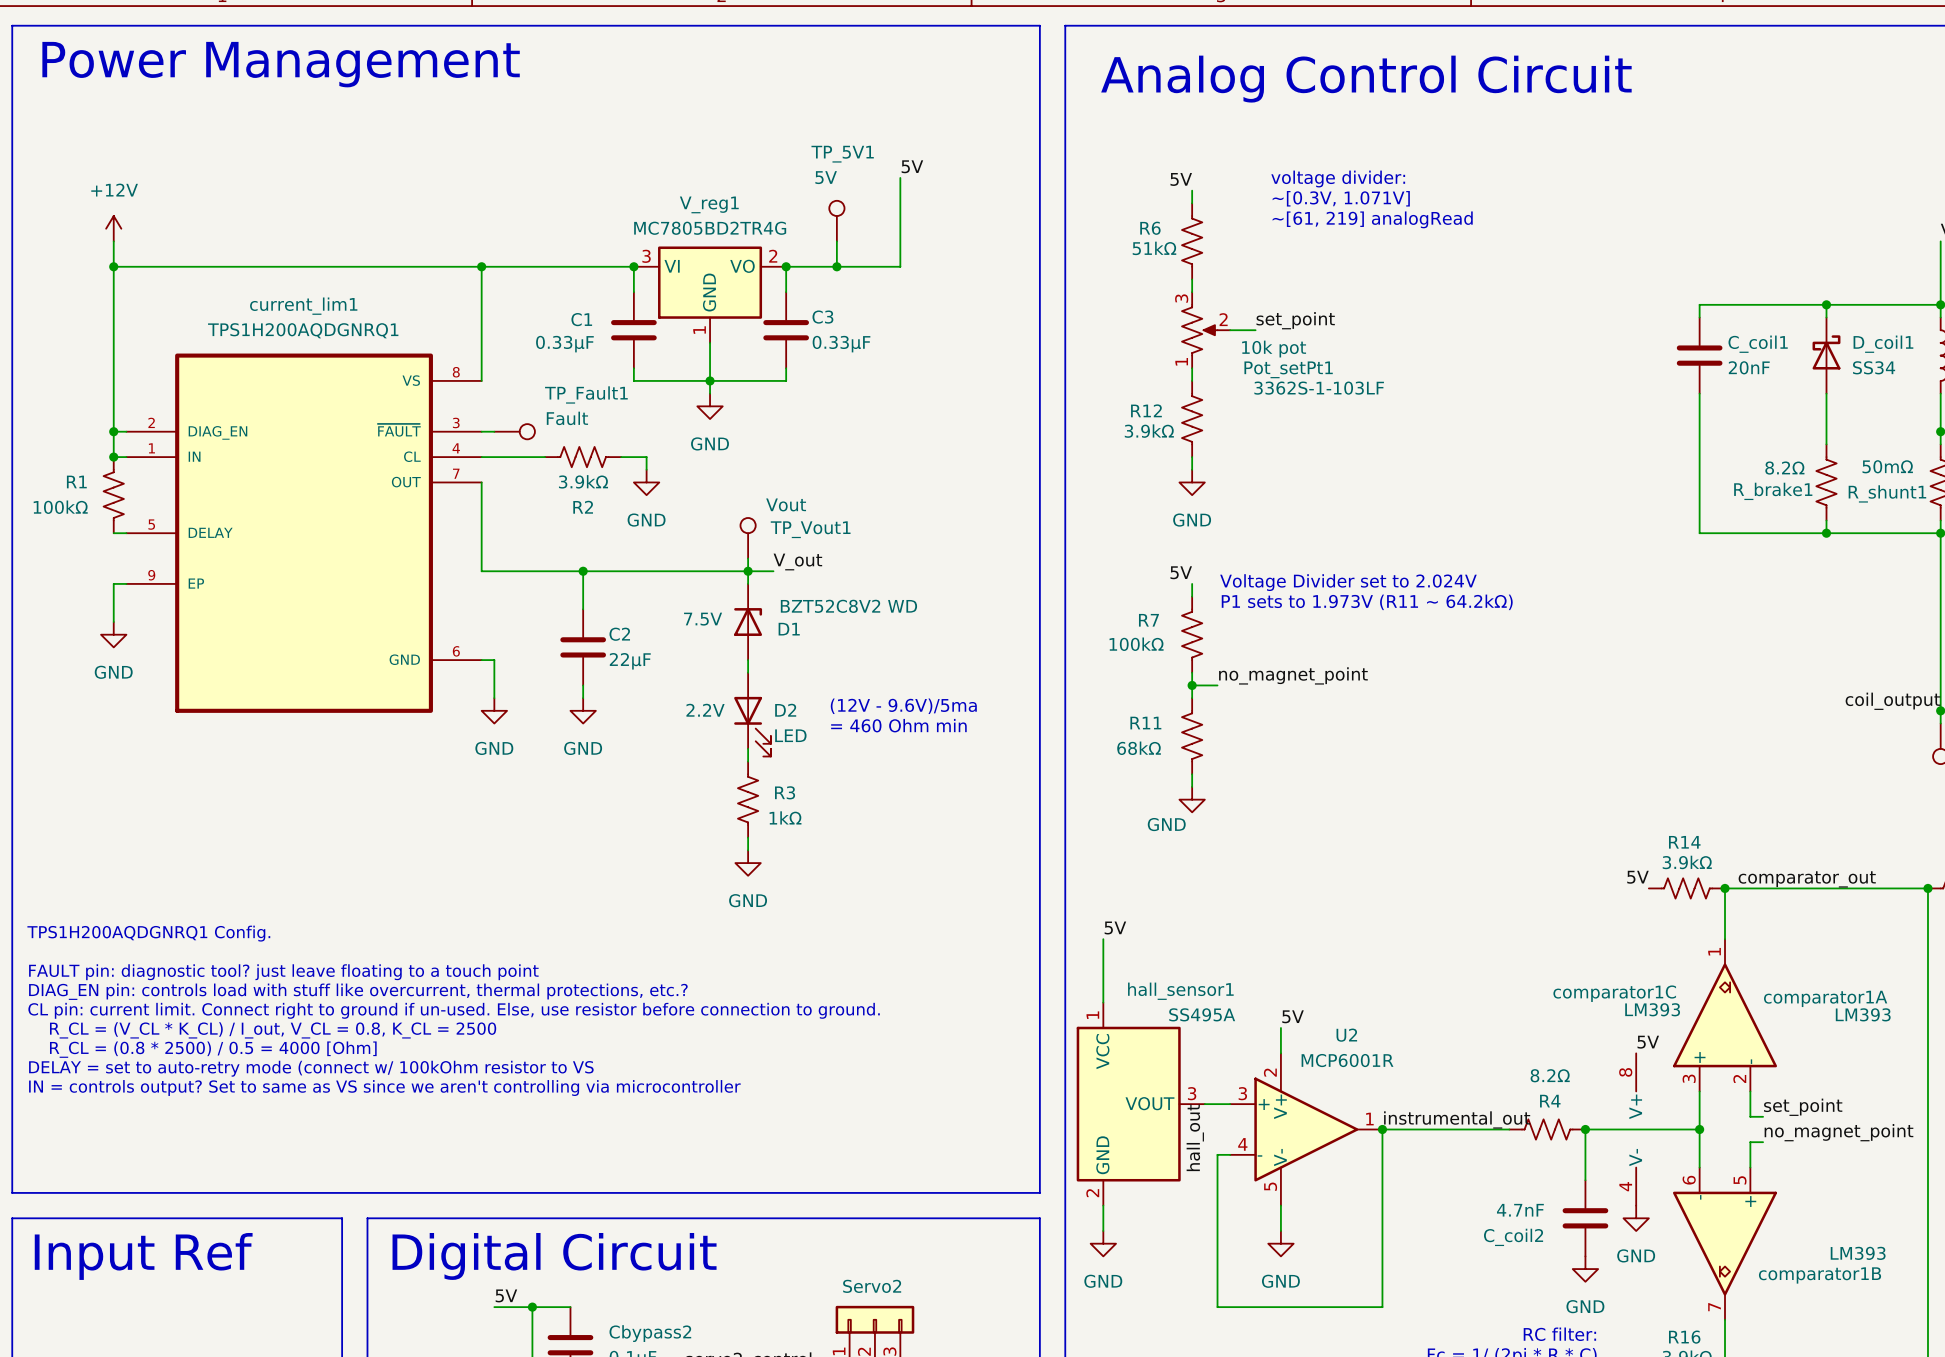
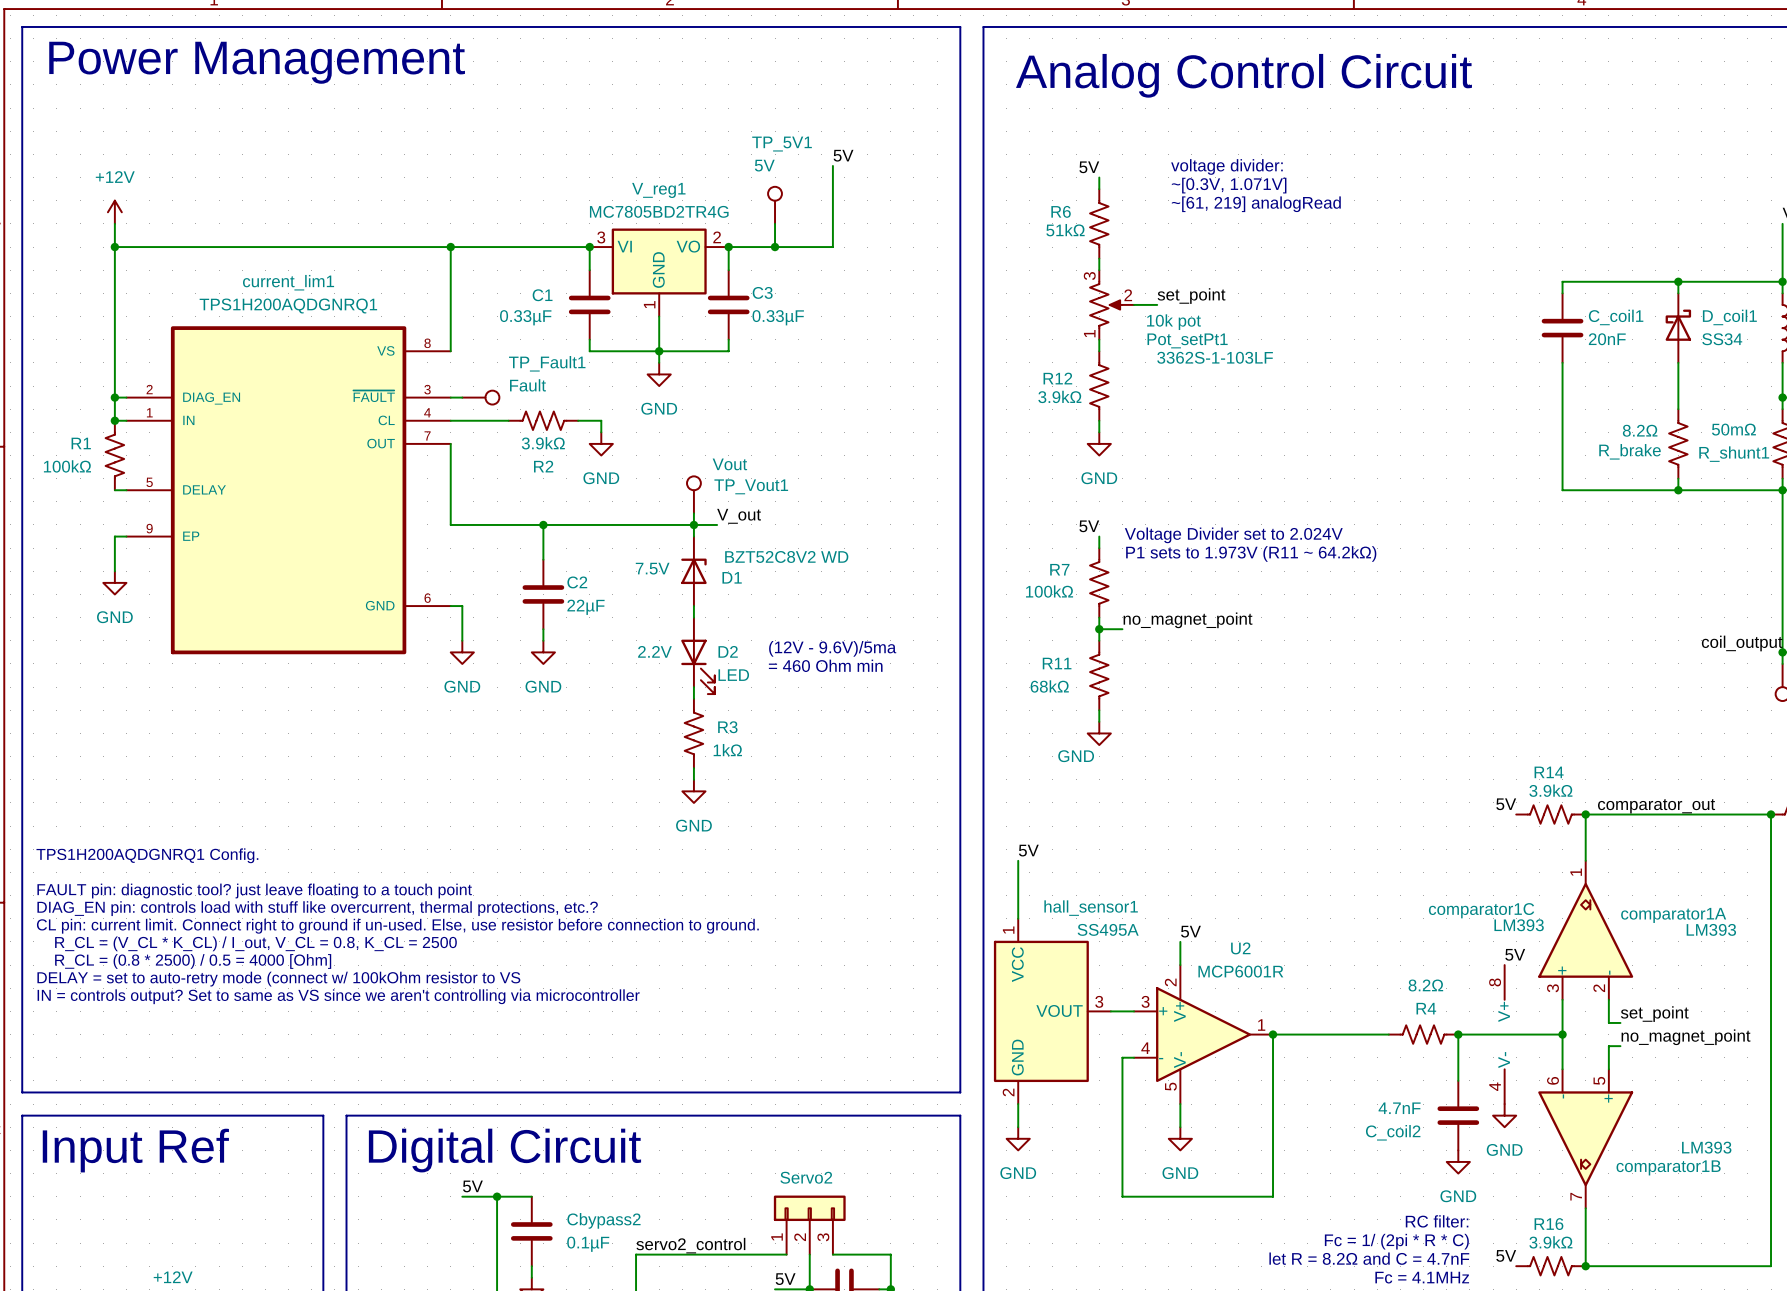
R_brake1 name: R_brake1 (1773, 491) -> R_brake (1630, 451)
label: instrumental_out (1457, 1119) -> none
label: hall_out (1195, 1137) -> none

